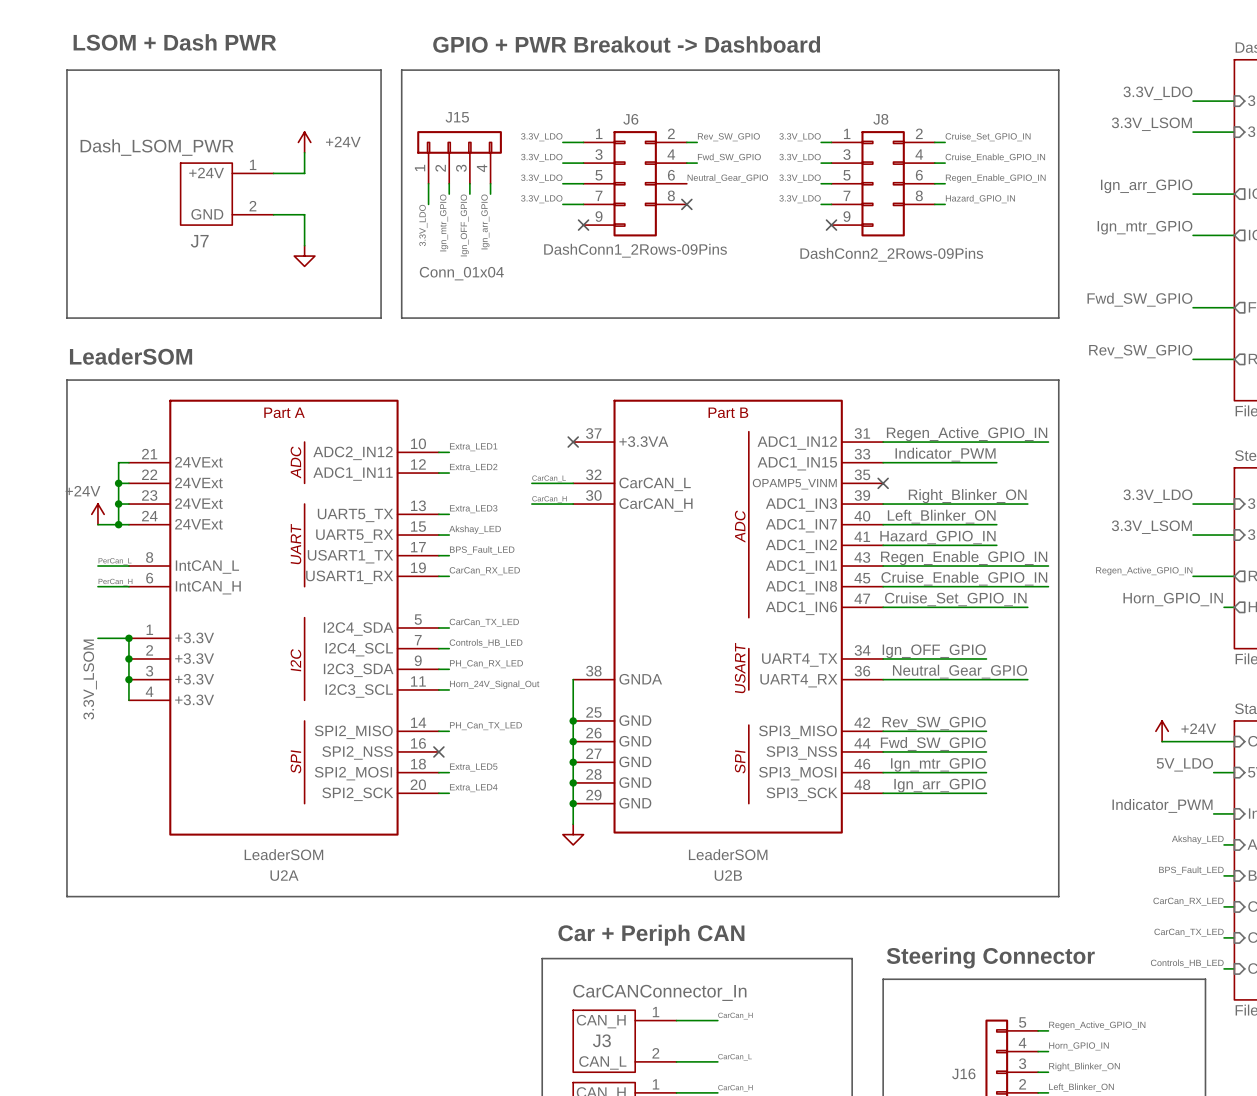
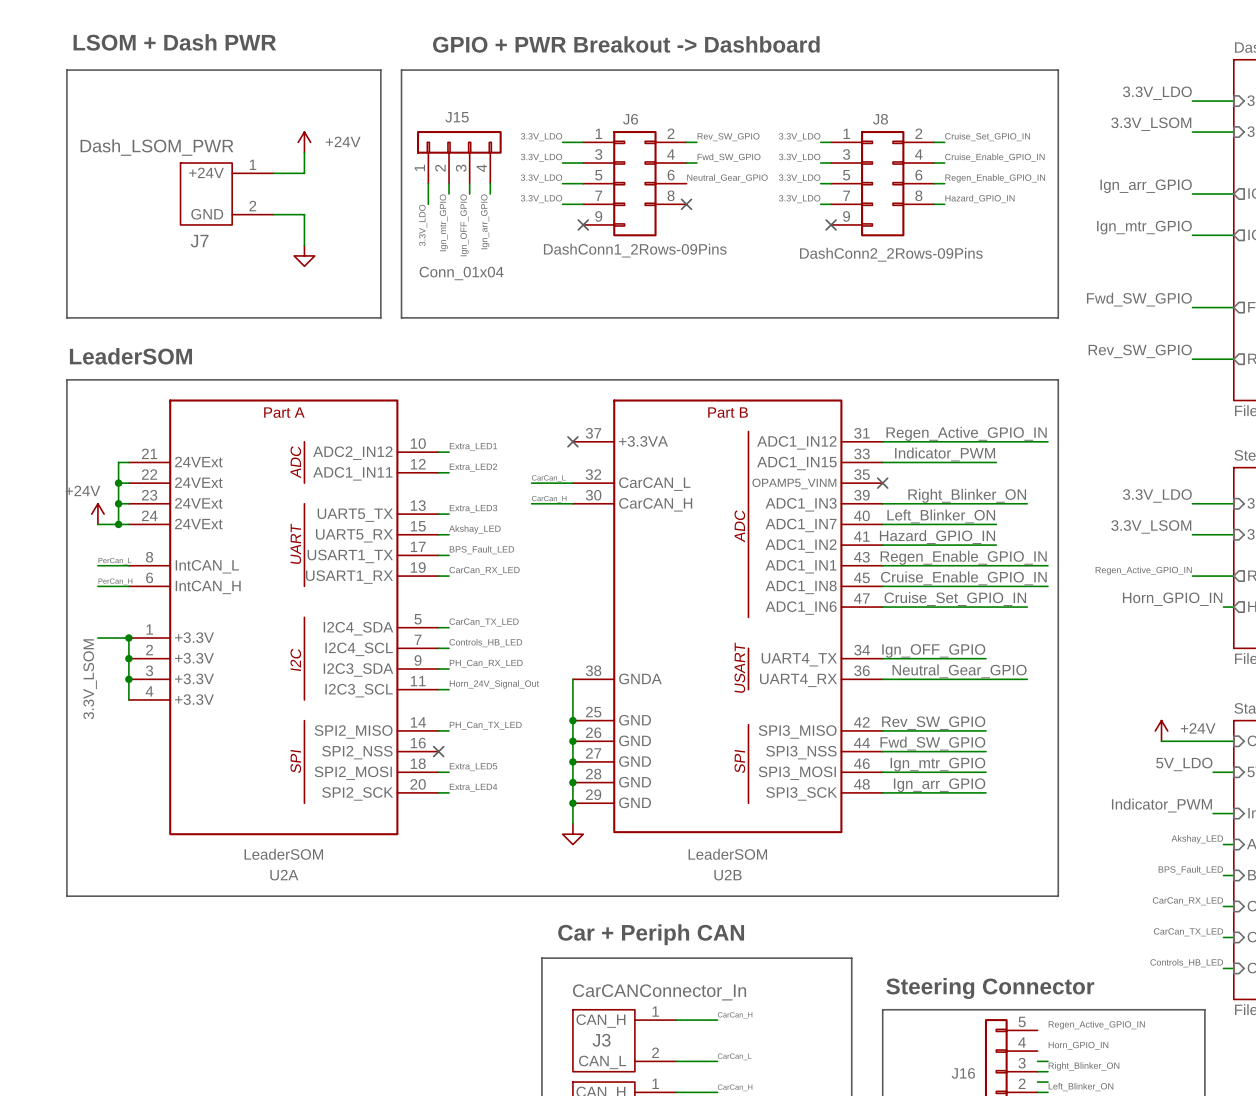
text position: Steering Connector (990, 957) -> Steering Connector (990, 988)
line: (883, 1010) (883, 979) (1205, 979) (1205, 1010) -> (882, 1009) (1204, 1009)
wire: (1038, 1030) (1048, 1030) -> (1037, 1061) (1047, 1061)
wire: (1038, 1051) (1048, 1051) -> (1037, 1082) (1047, 1082)

